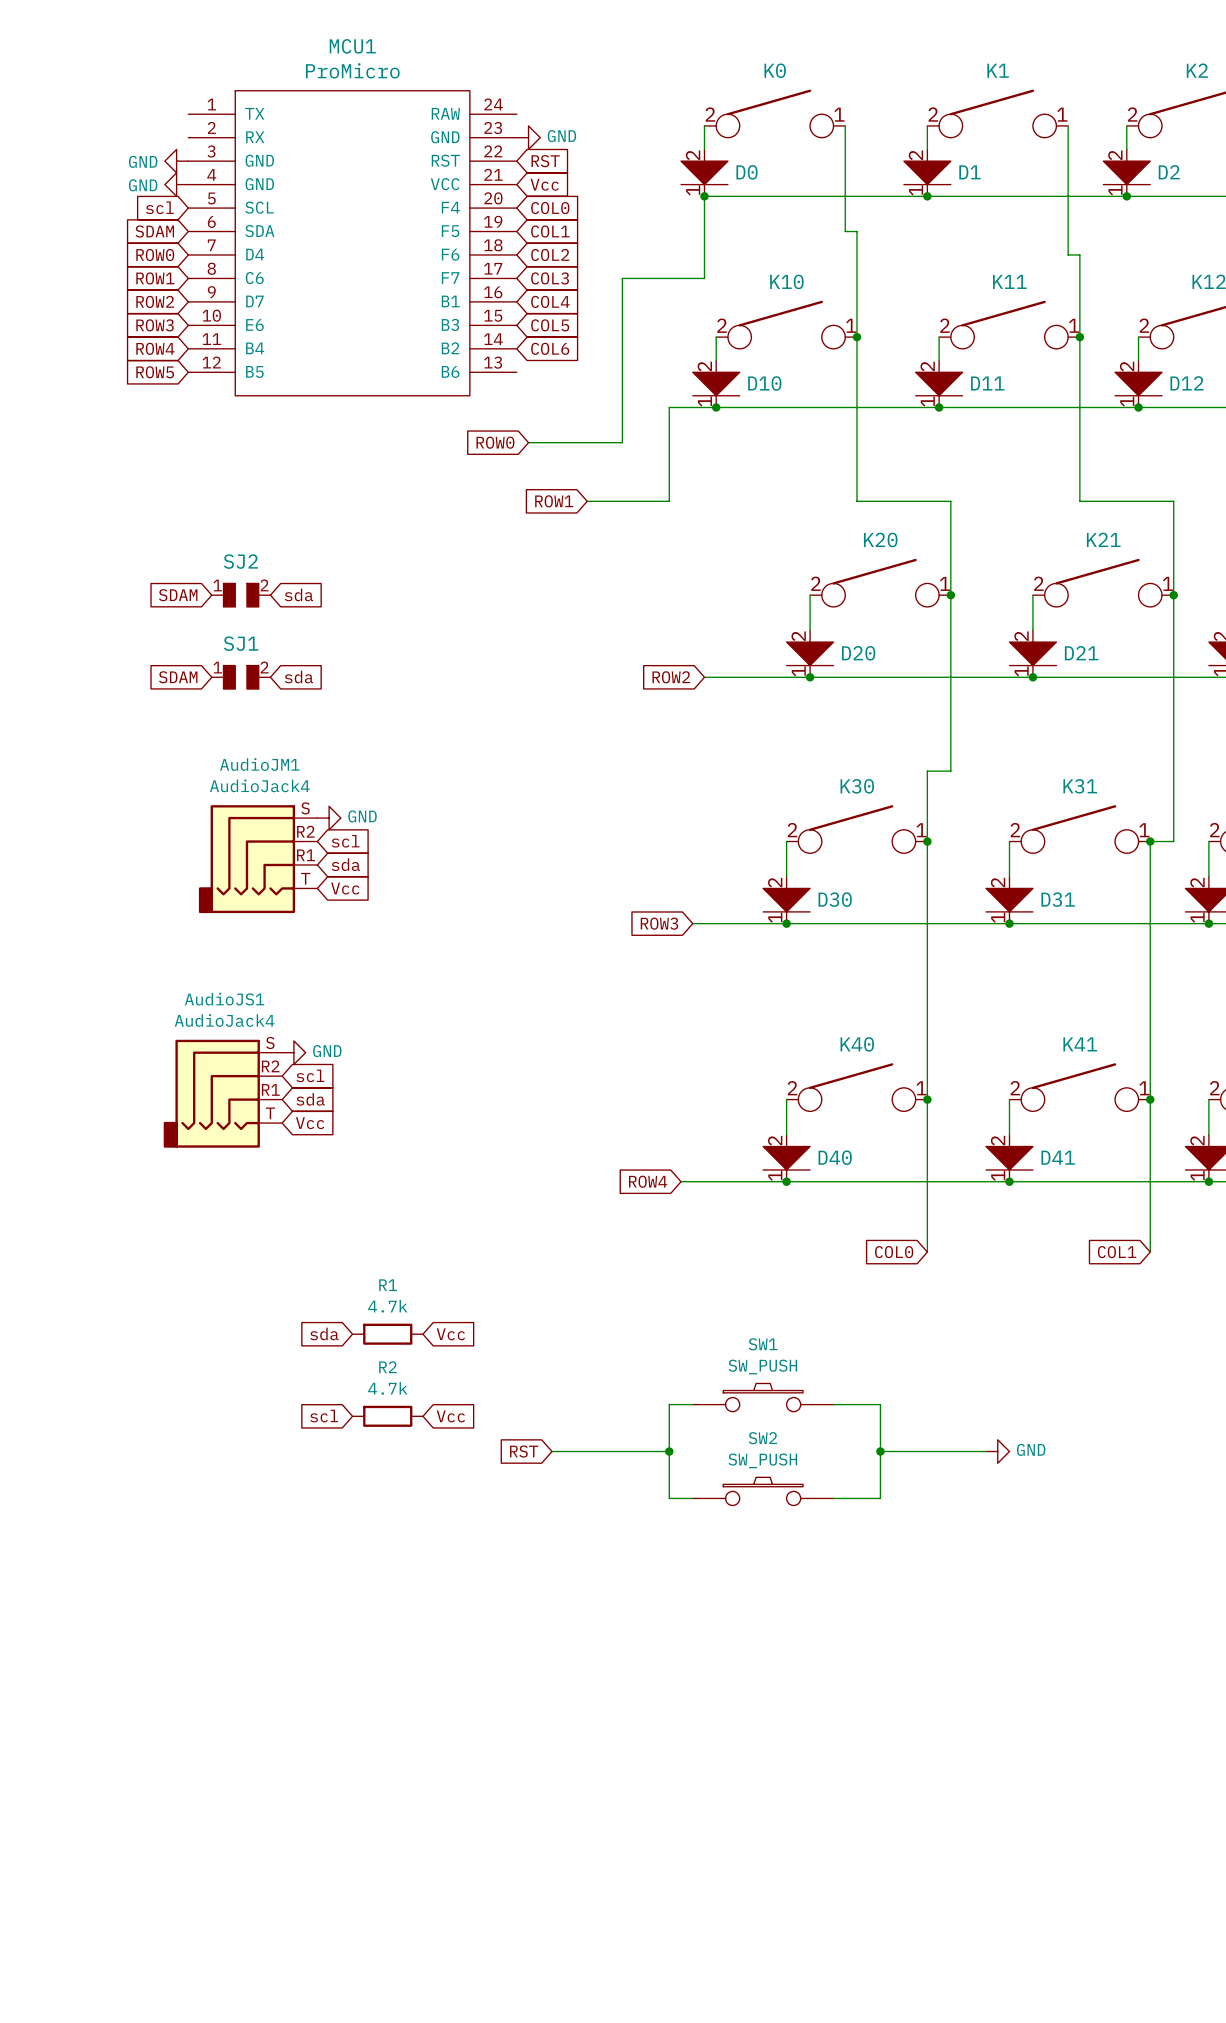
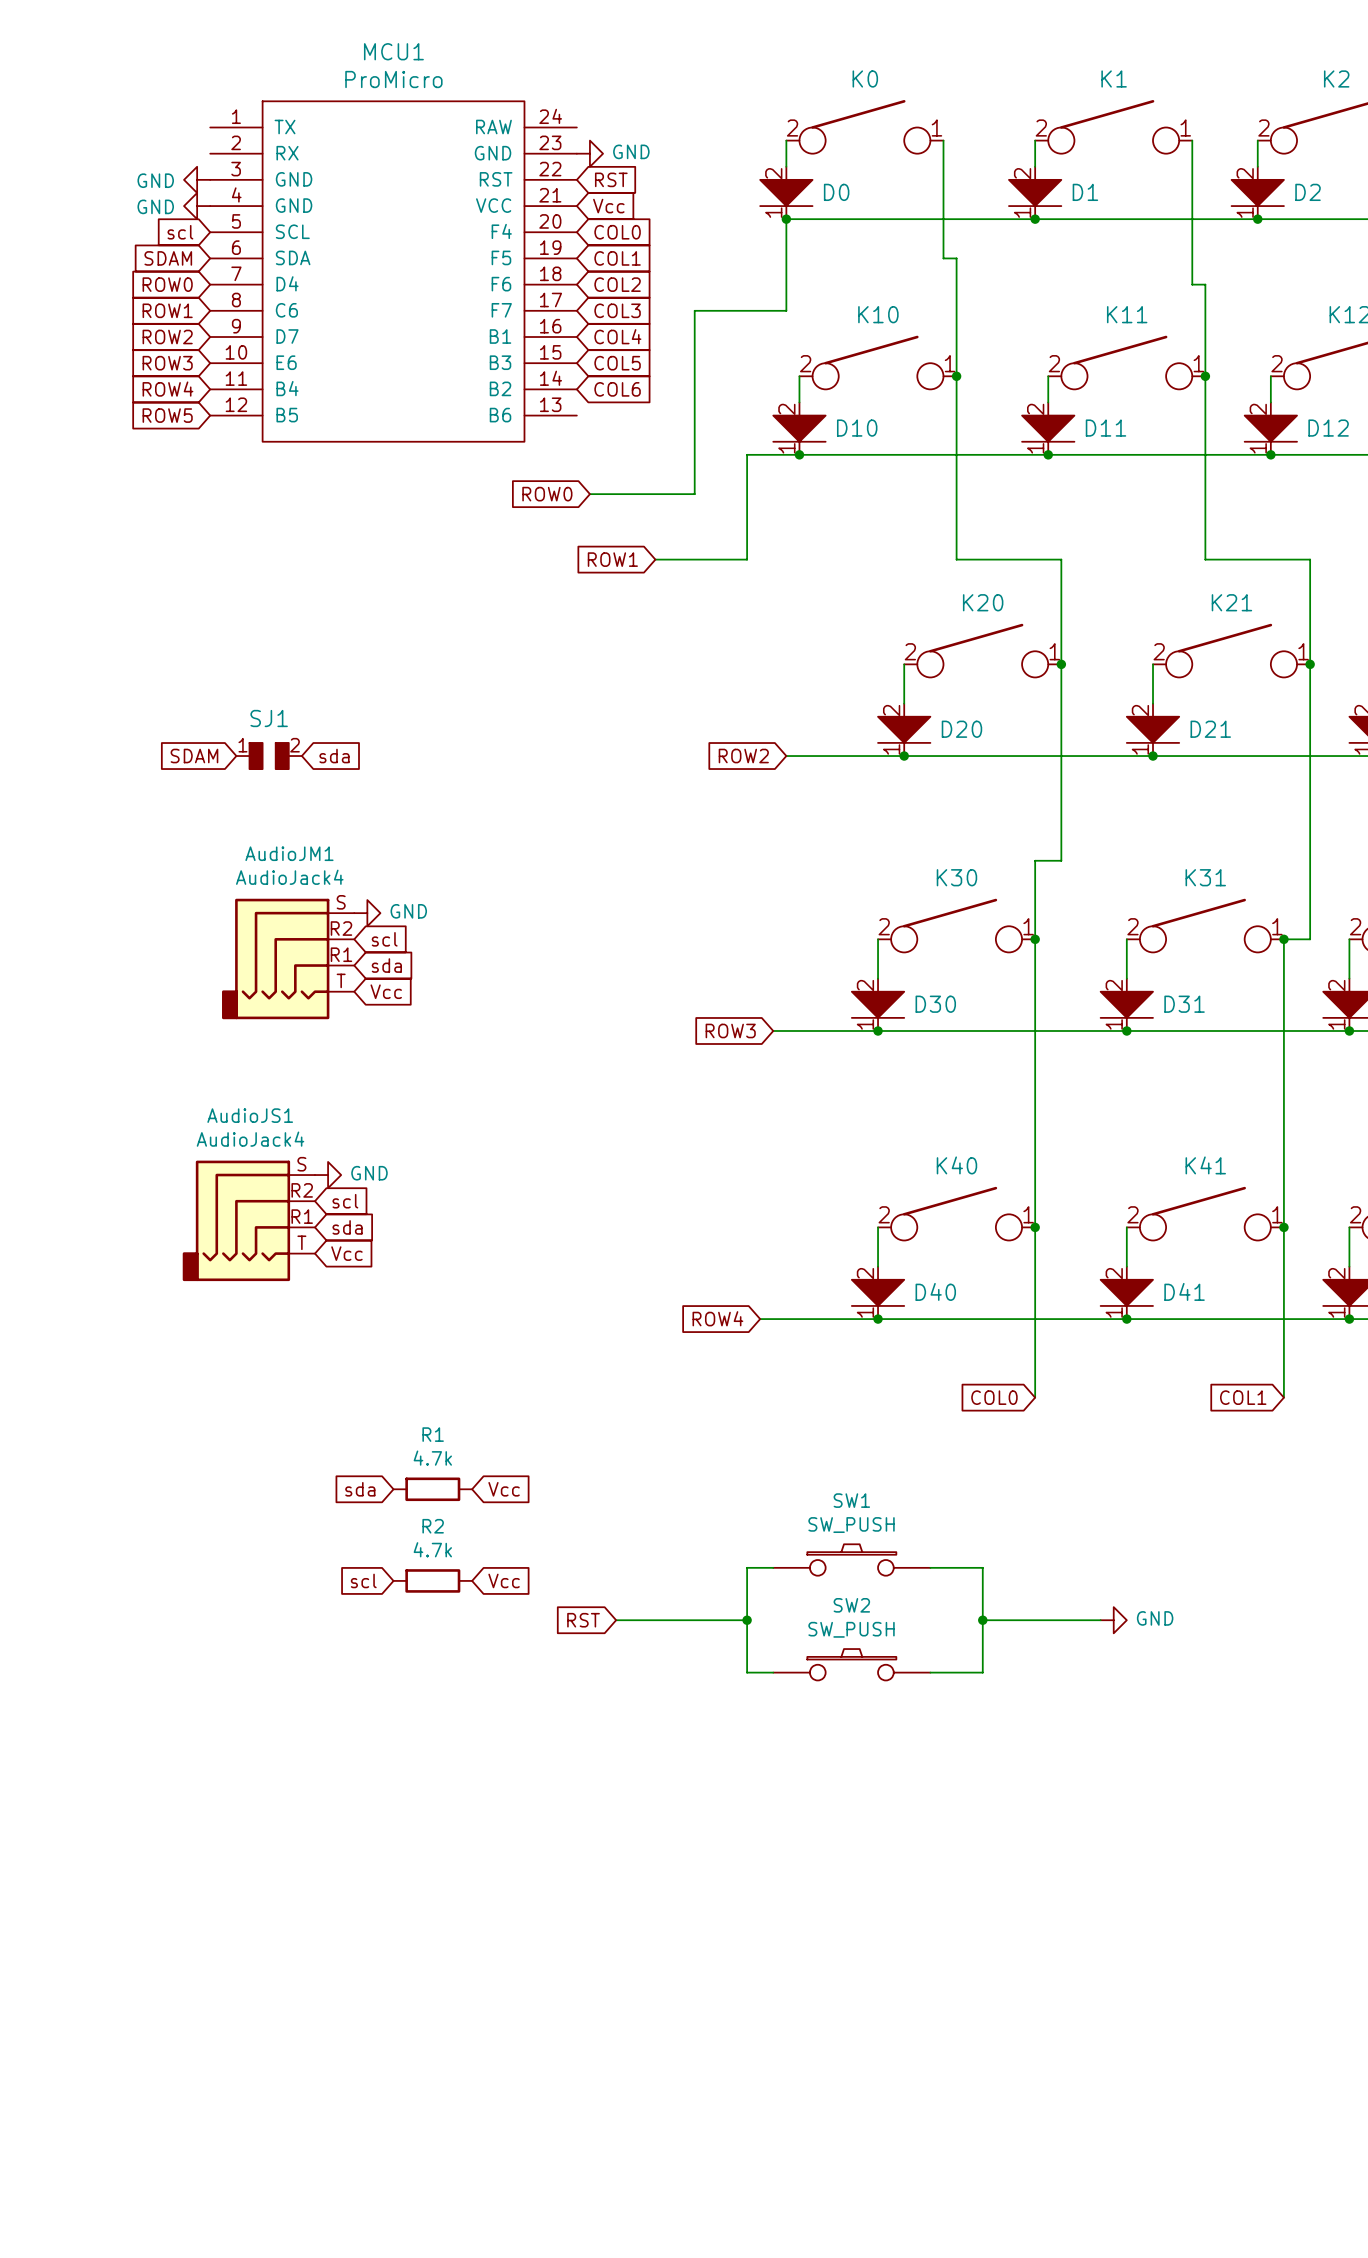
global label: sda (298, 594) -> none
global label: SDAM (178, 595) -> none
SJ2: (241, 595) -> none

